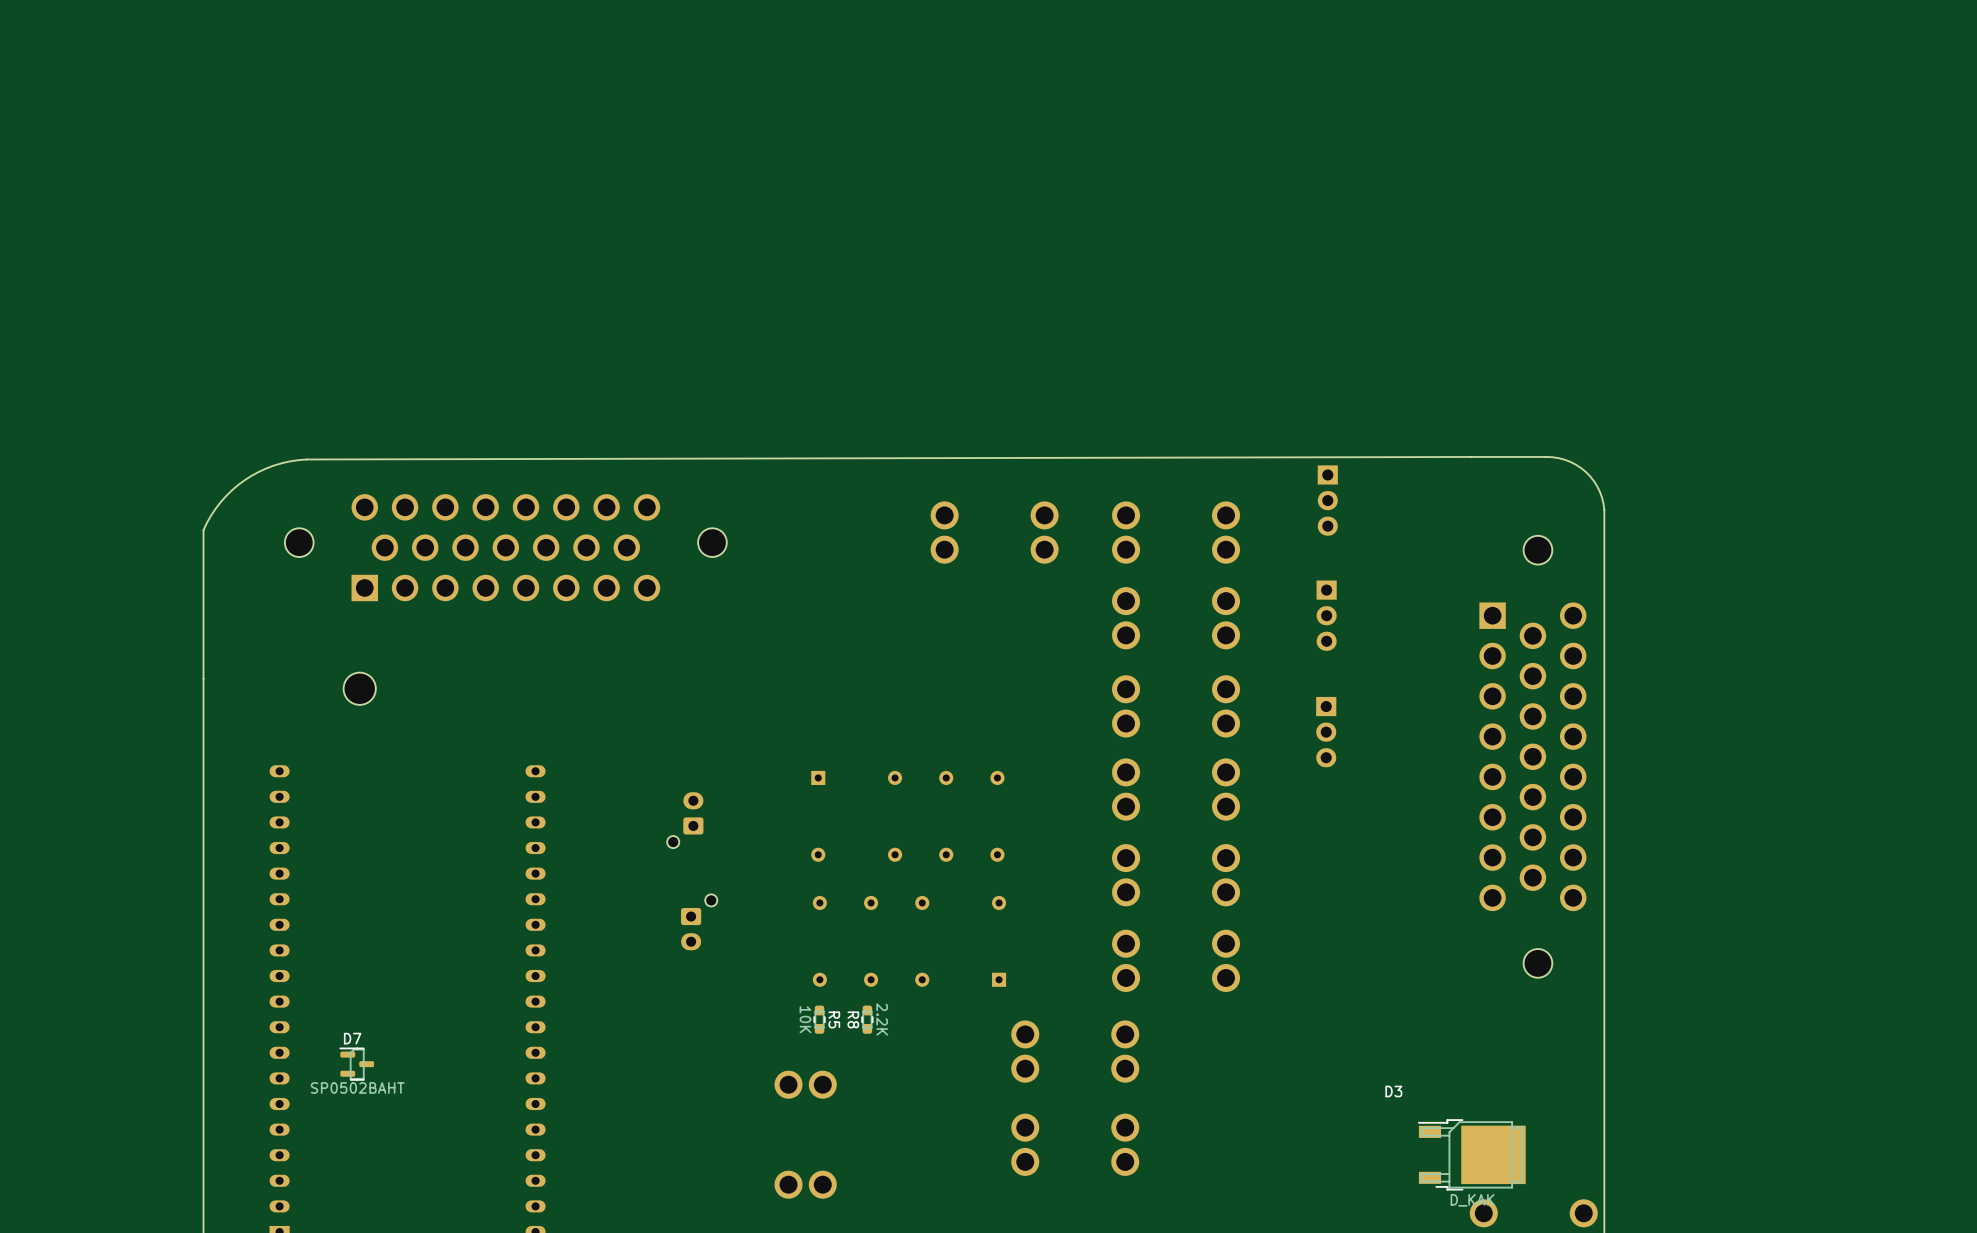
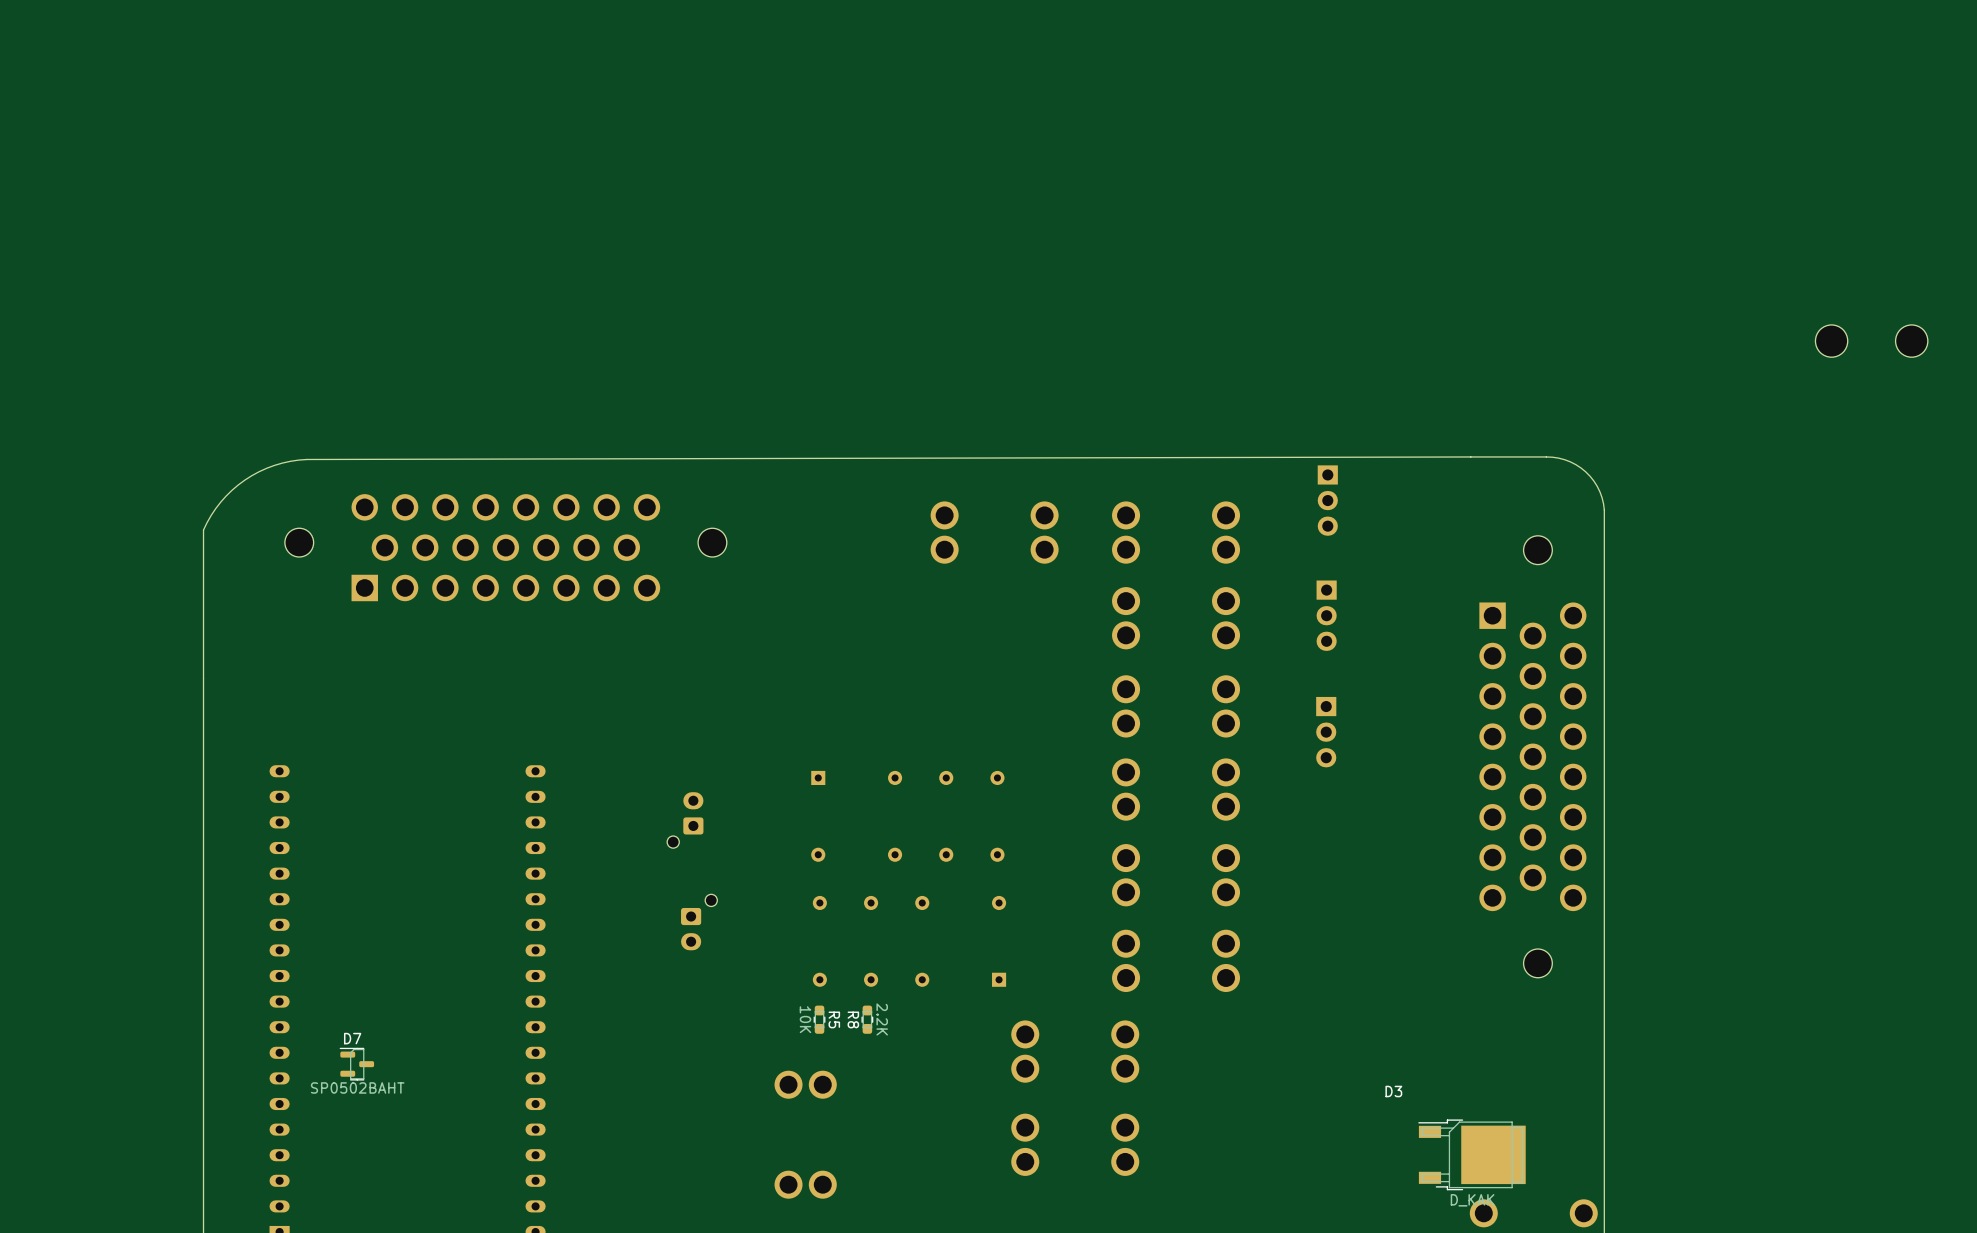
part: none -> (1831, 341)
part: none -> (1911, 341)
part: (359, 688) -> none

